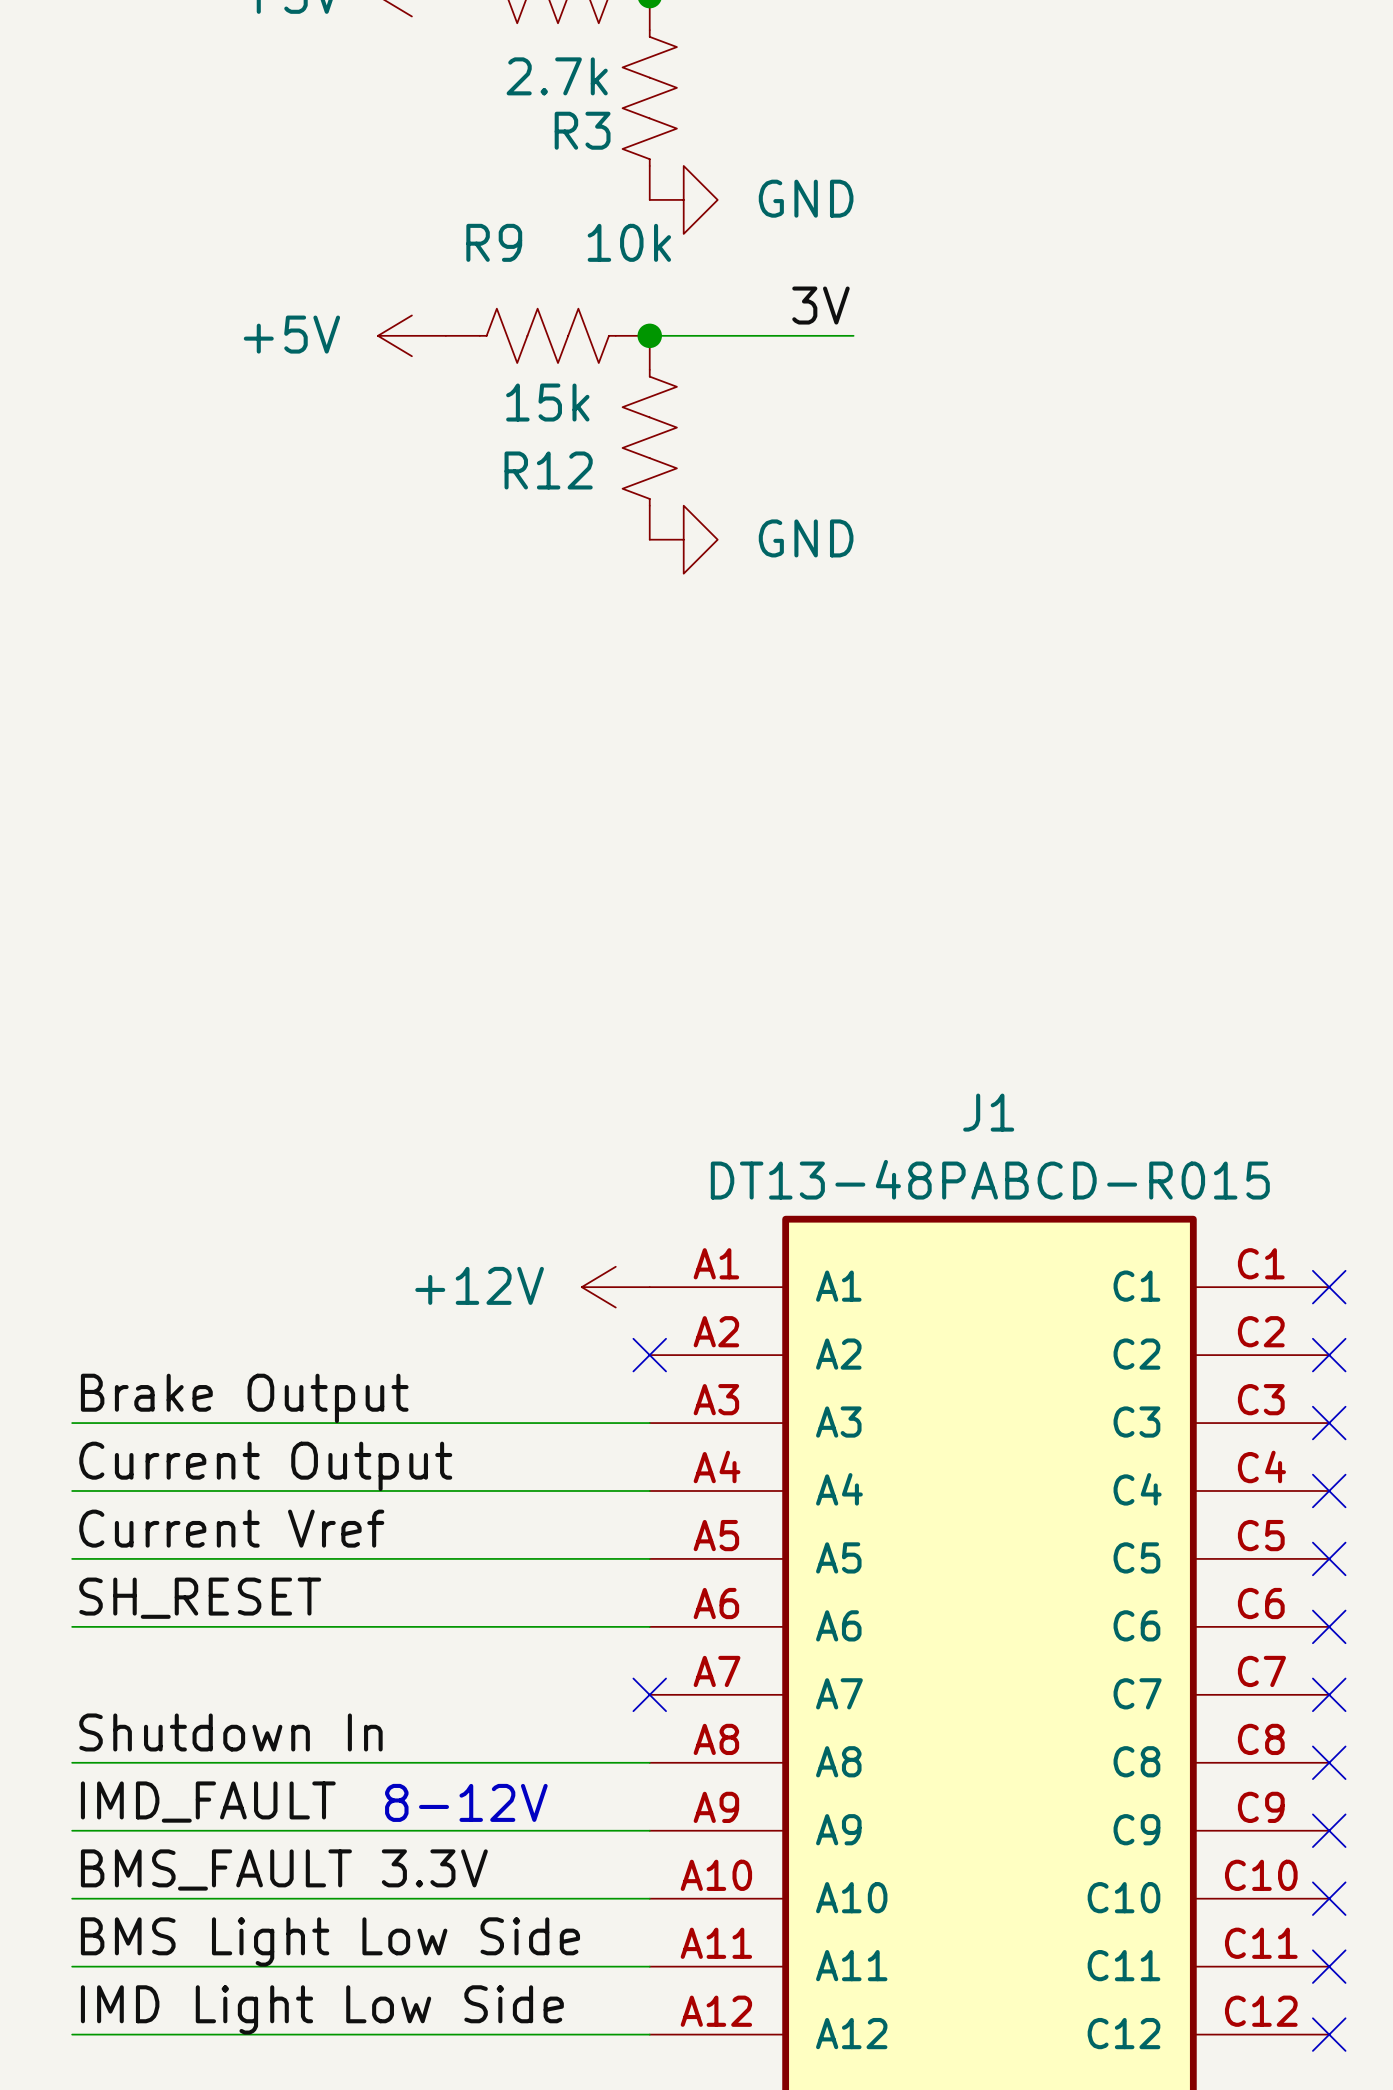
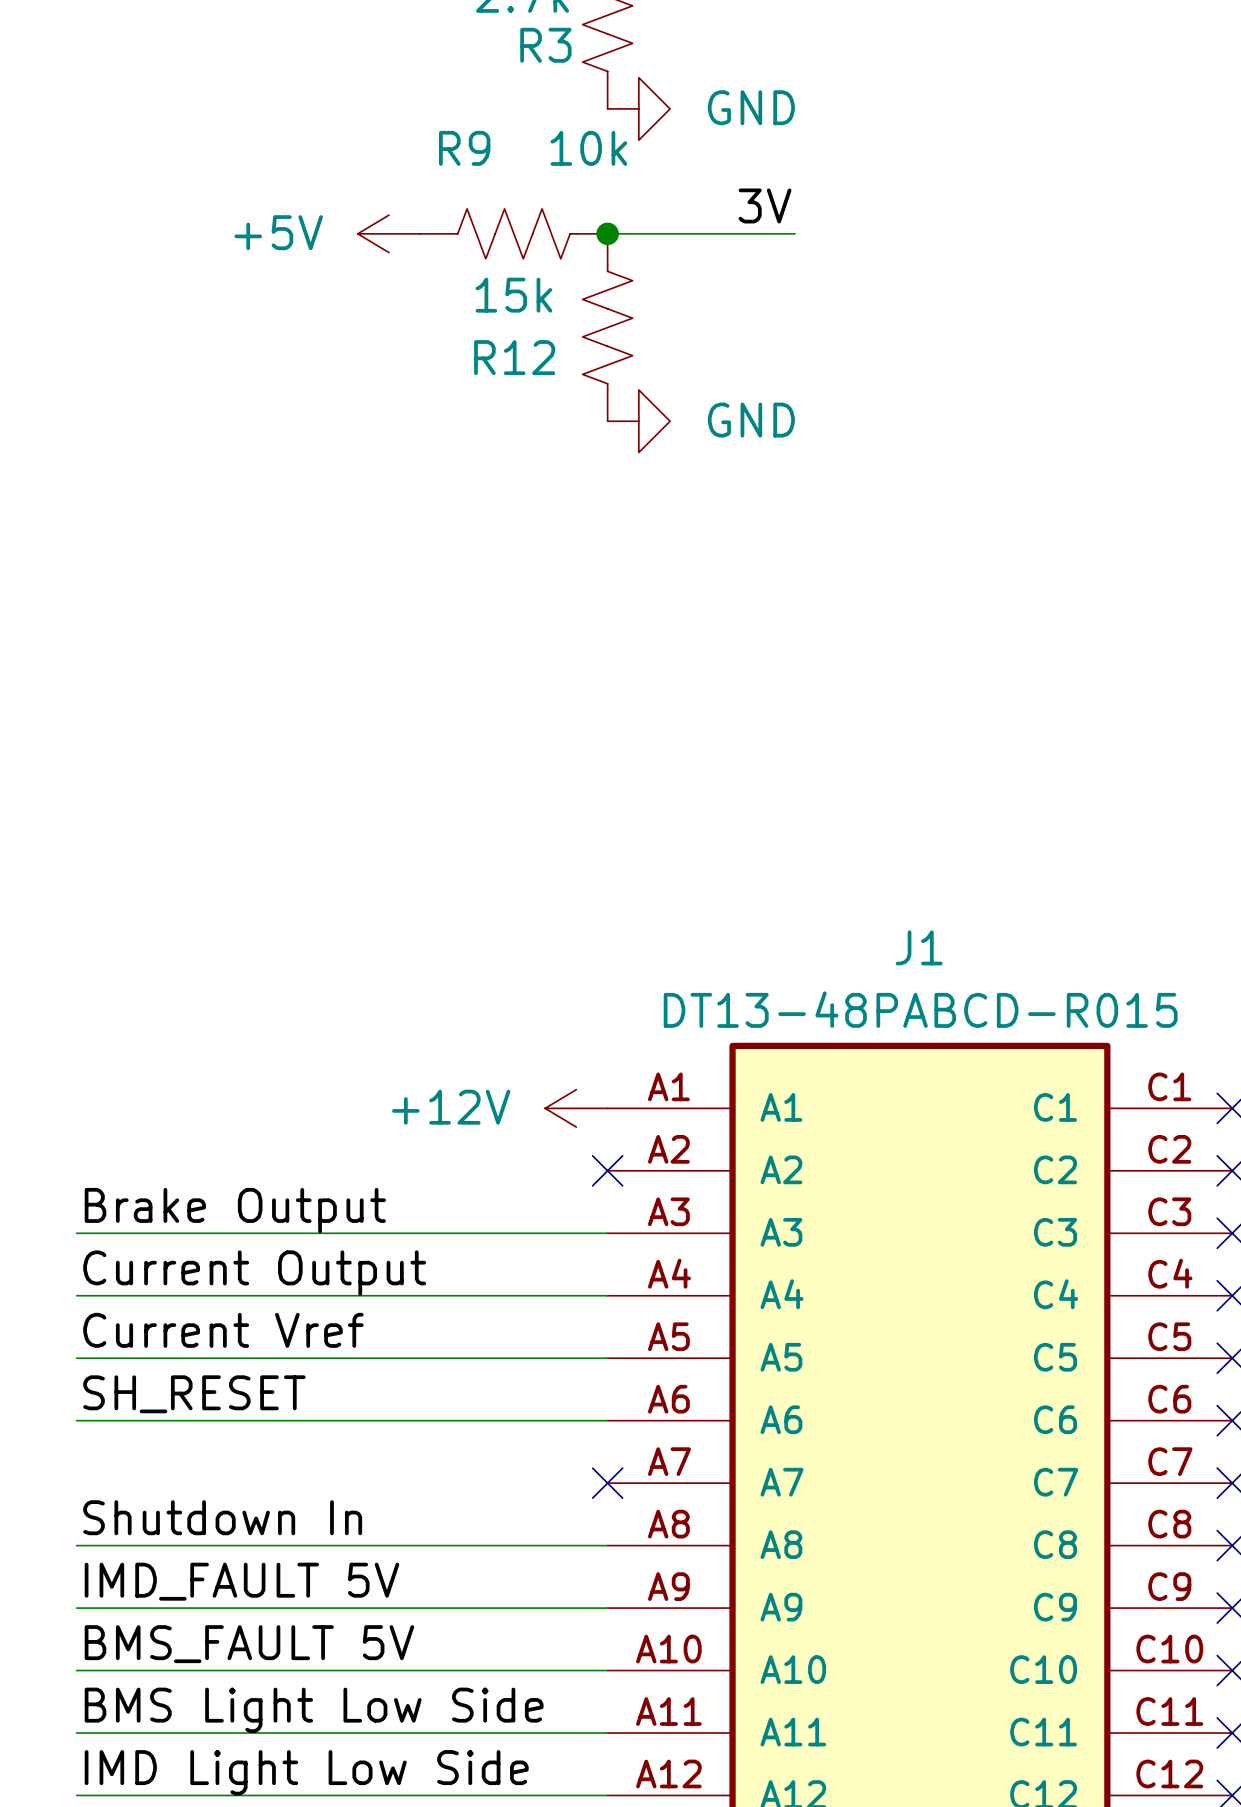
label: IMD_FAULT (208, 1802) -> IMD_FAULT 5V (241, 1581)
text: 8-12V (466, 1802) -> none
label: BMS_FAULT 3.3V (284, 1869) -> BMS_FAULT 5V (249, 1644)

